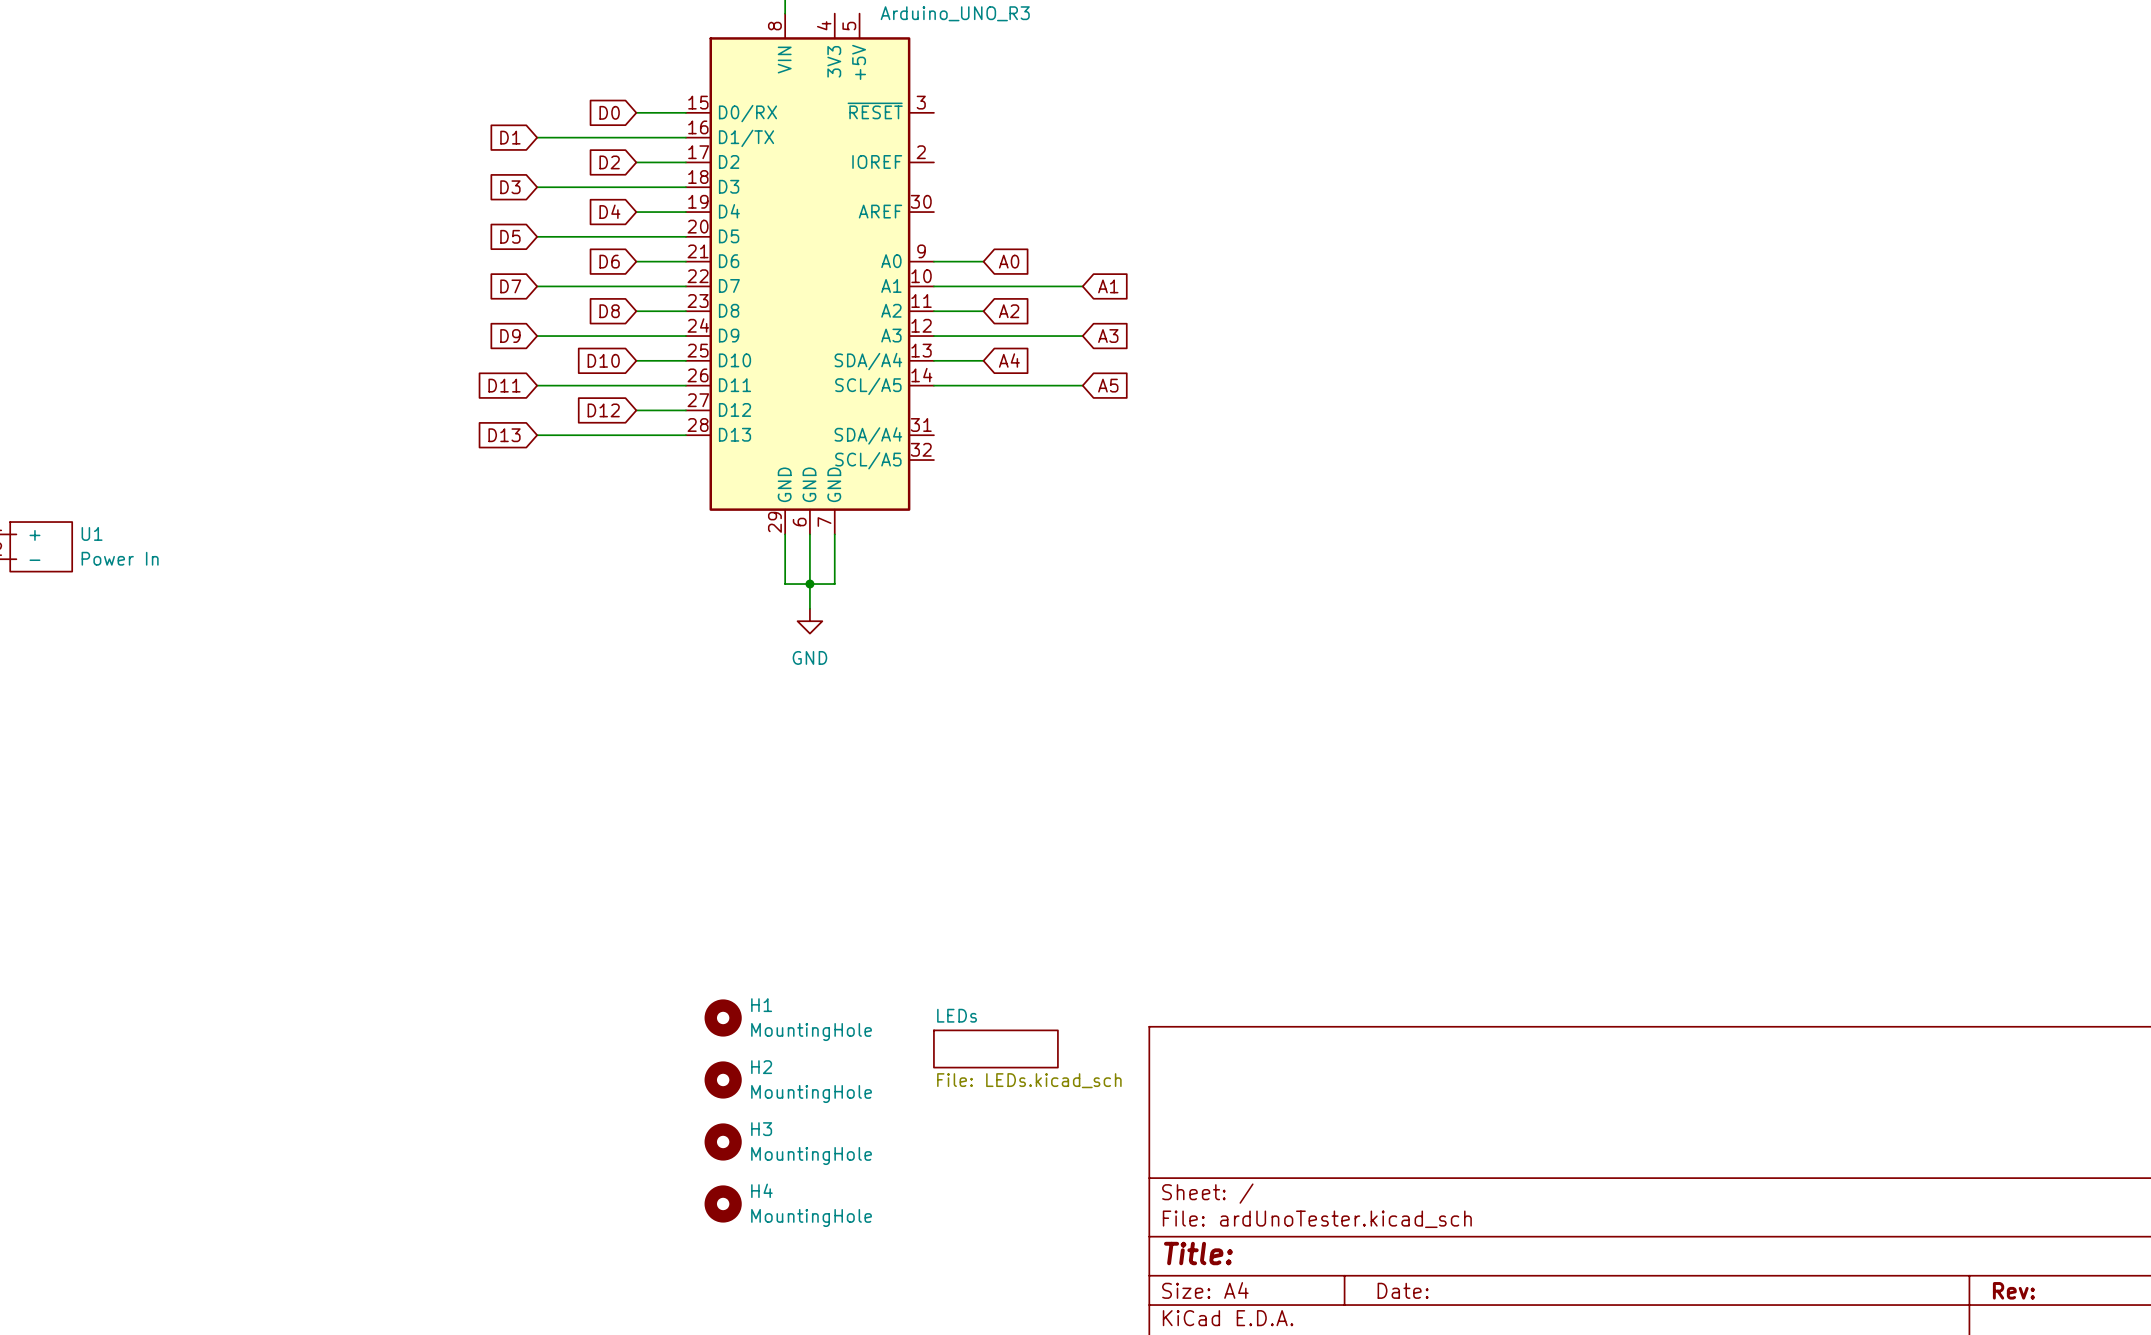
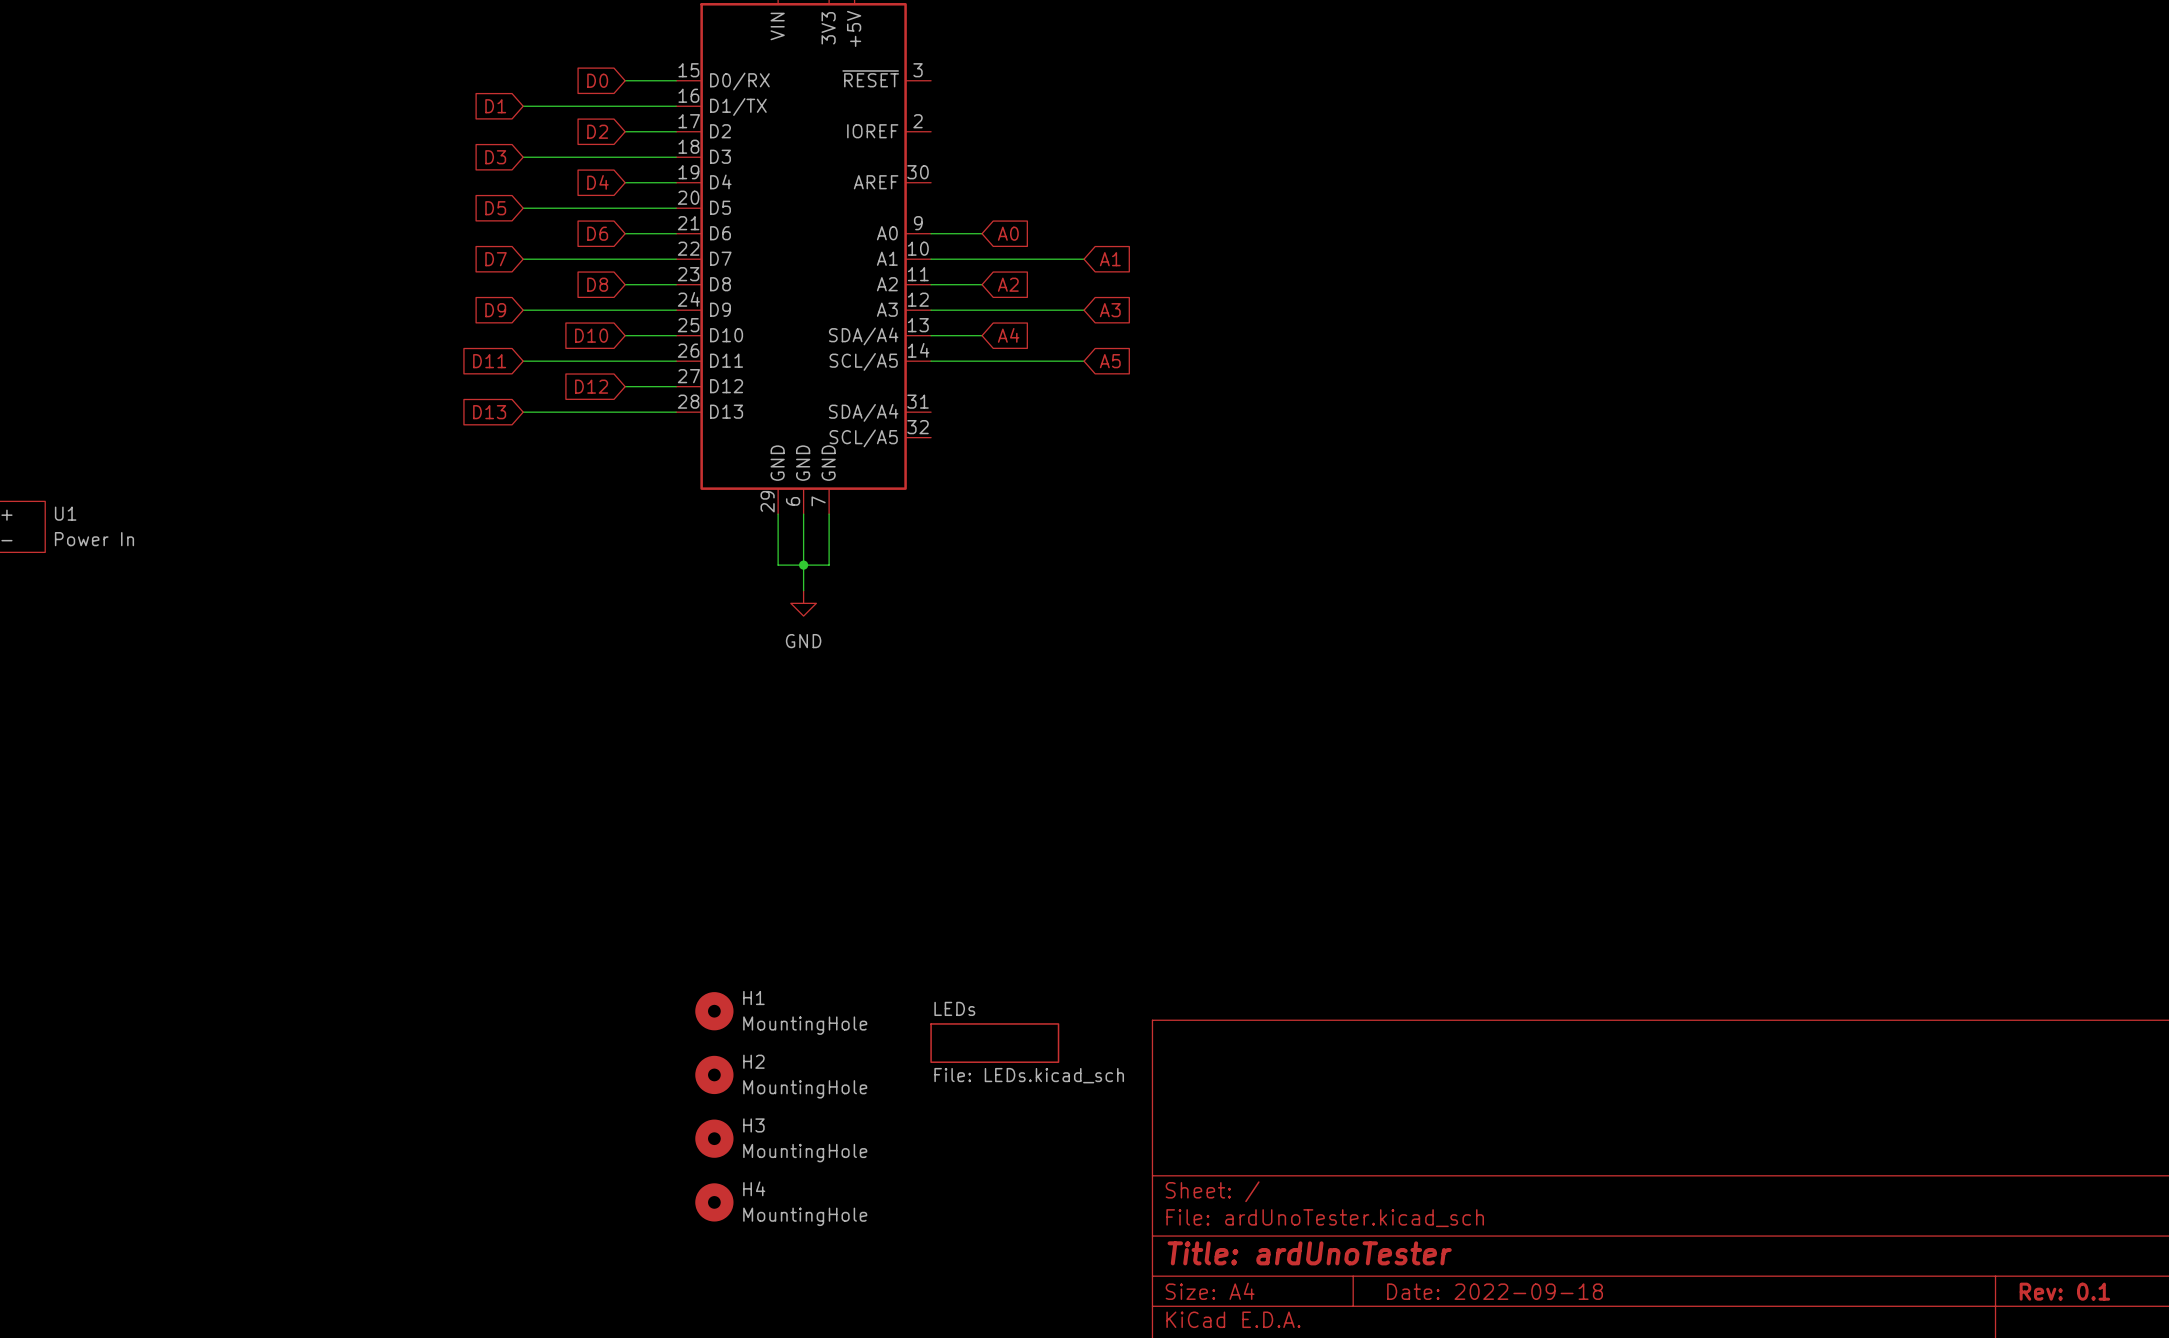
title block: Title: (1198, 1253) -> Title: ardUnoTester (1309, 1253)
title block: Date: (1403, 1290) -> Date: 2022-09-18 (1495, 1291)
title block: Rev: (2013, 1290) -> Rev: 0.1 (2064, 1291)

